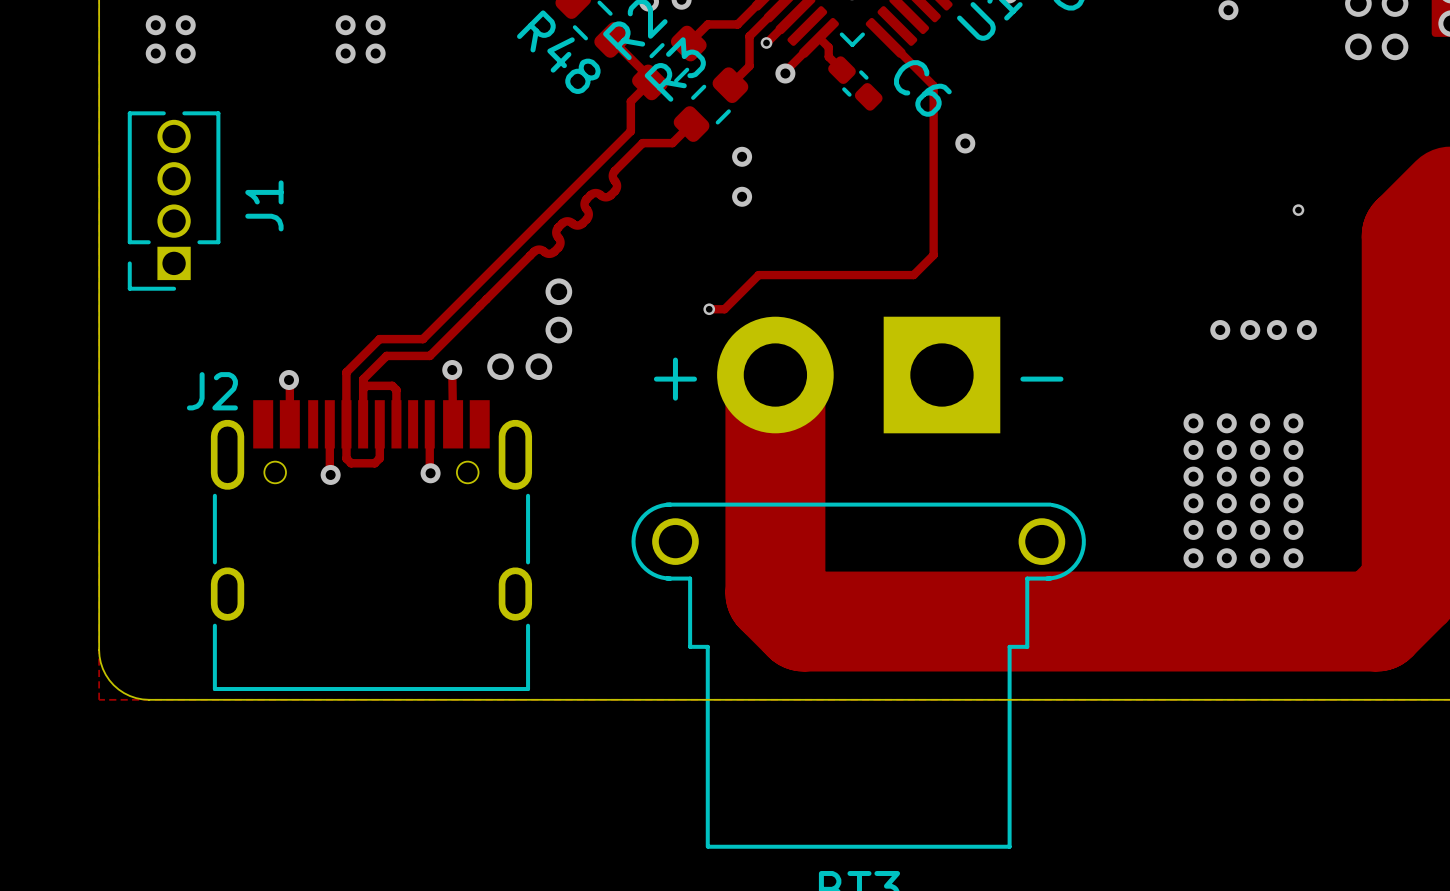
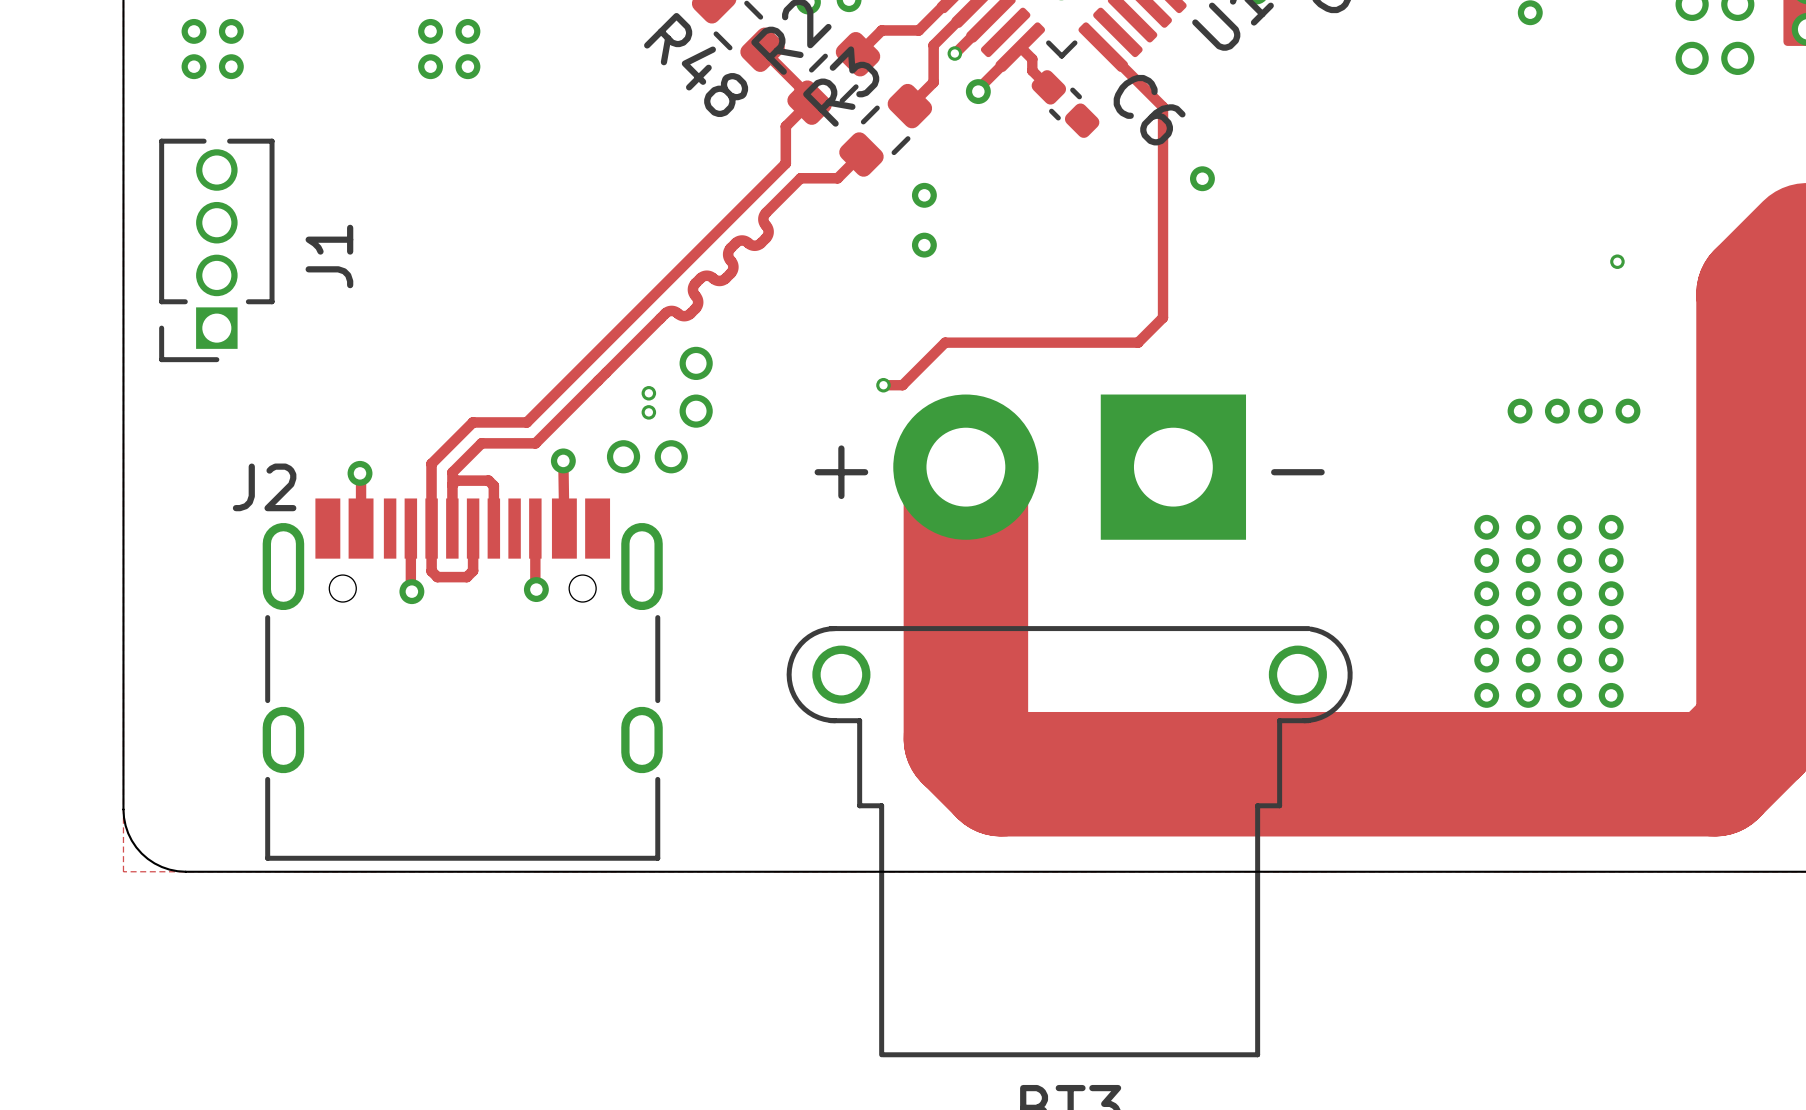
via: none -> (648, 393)
via: none -> (648, 412)

